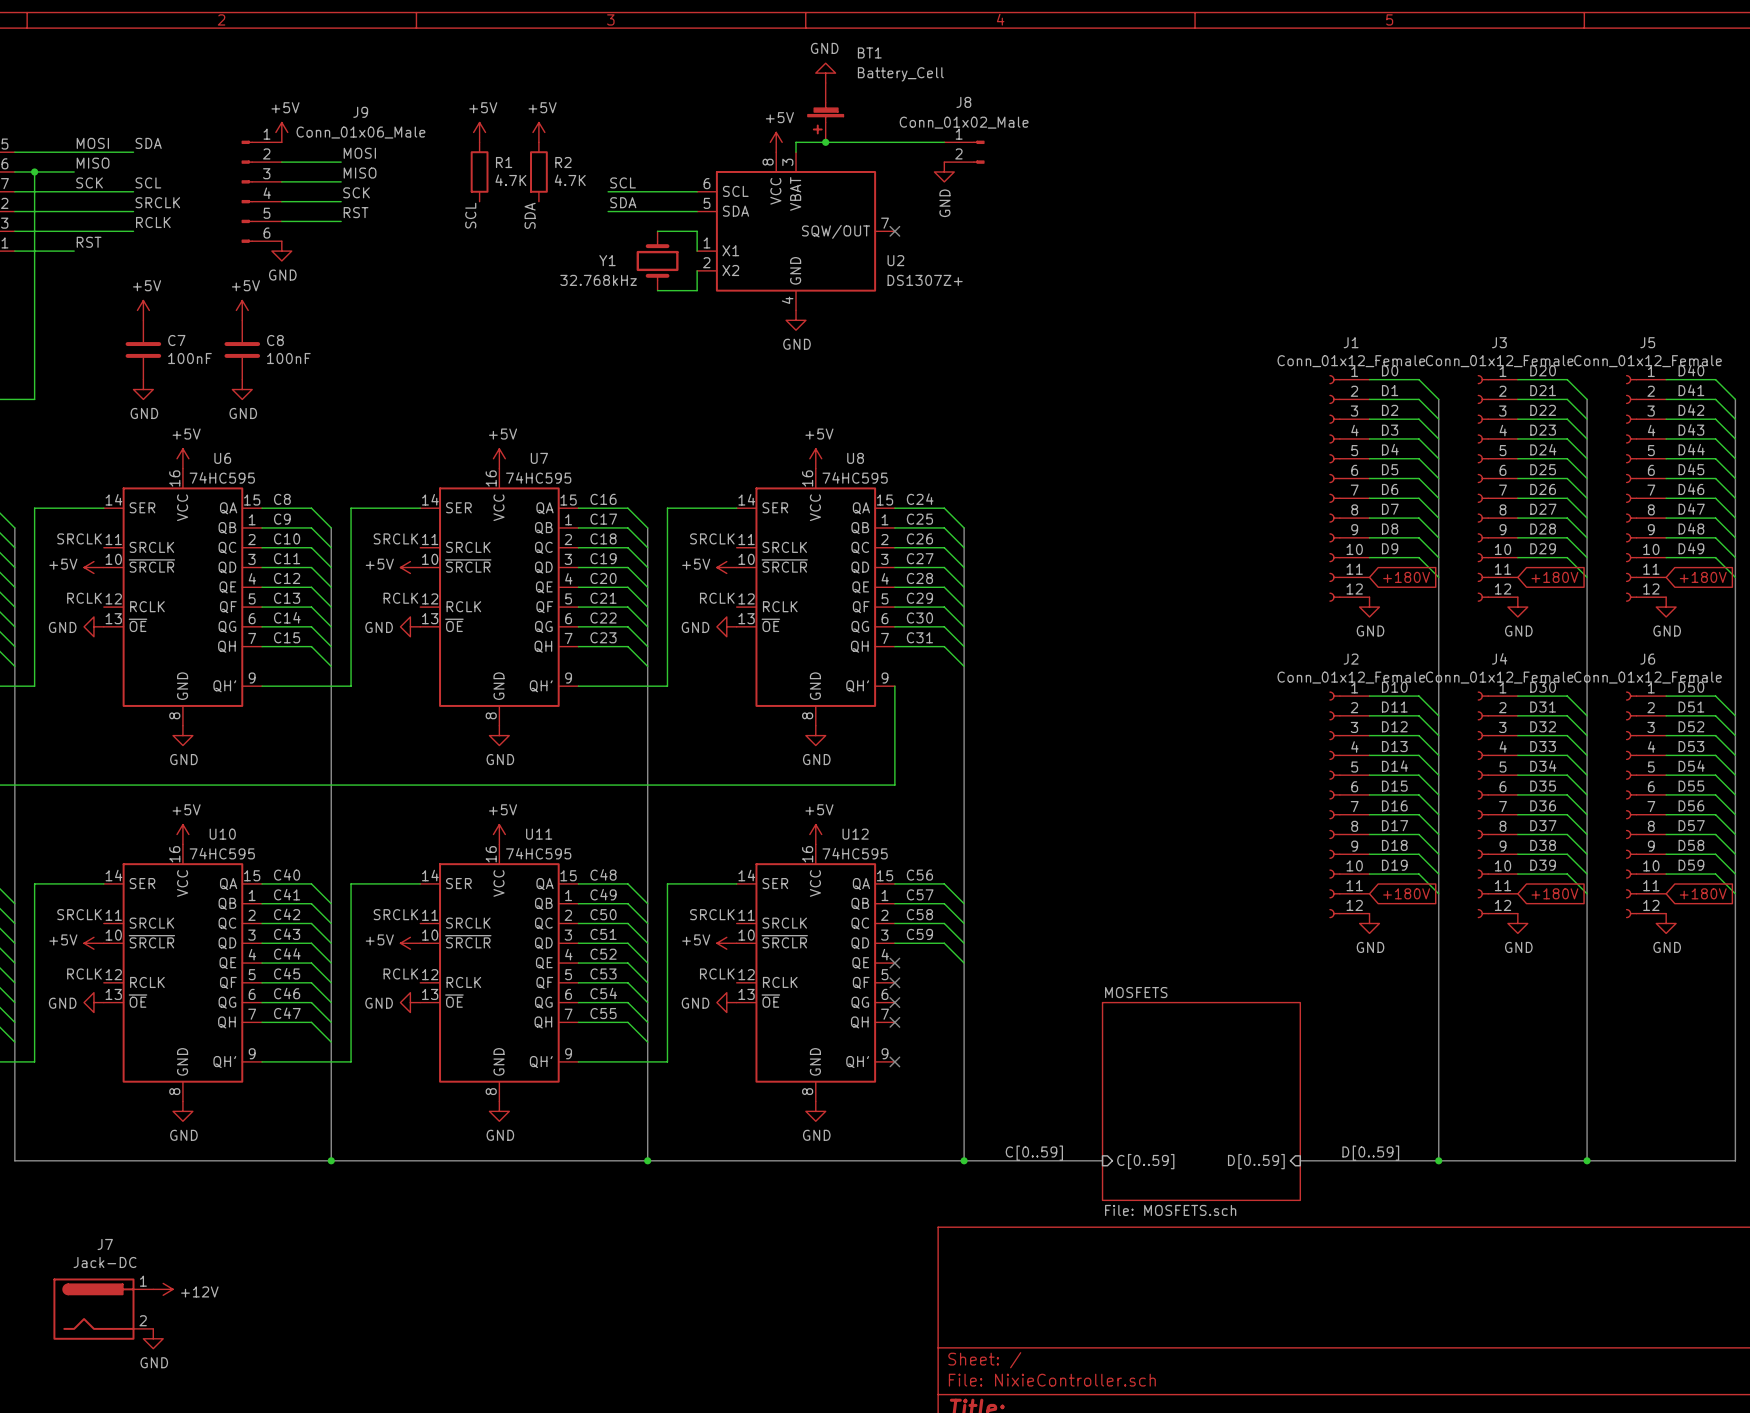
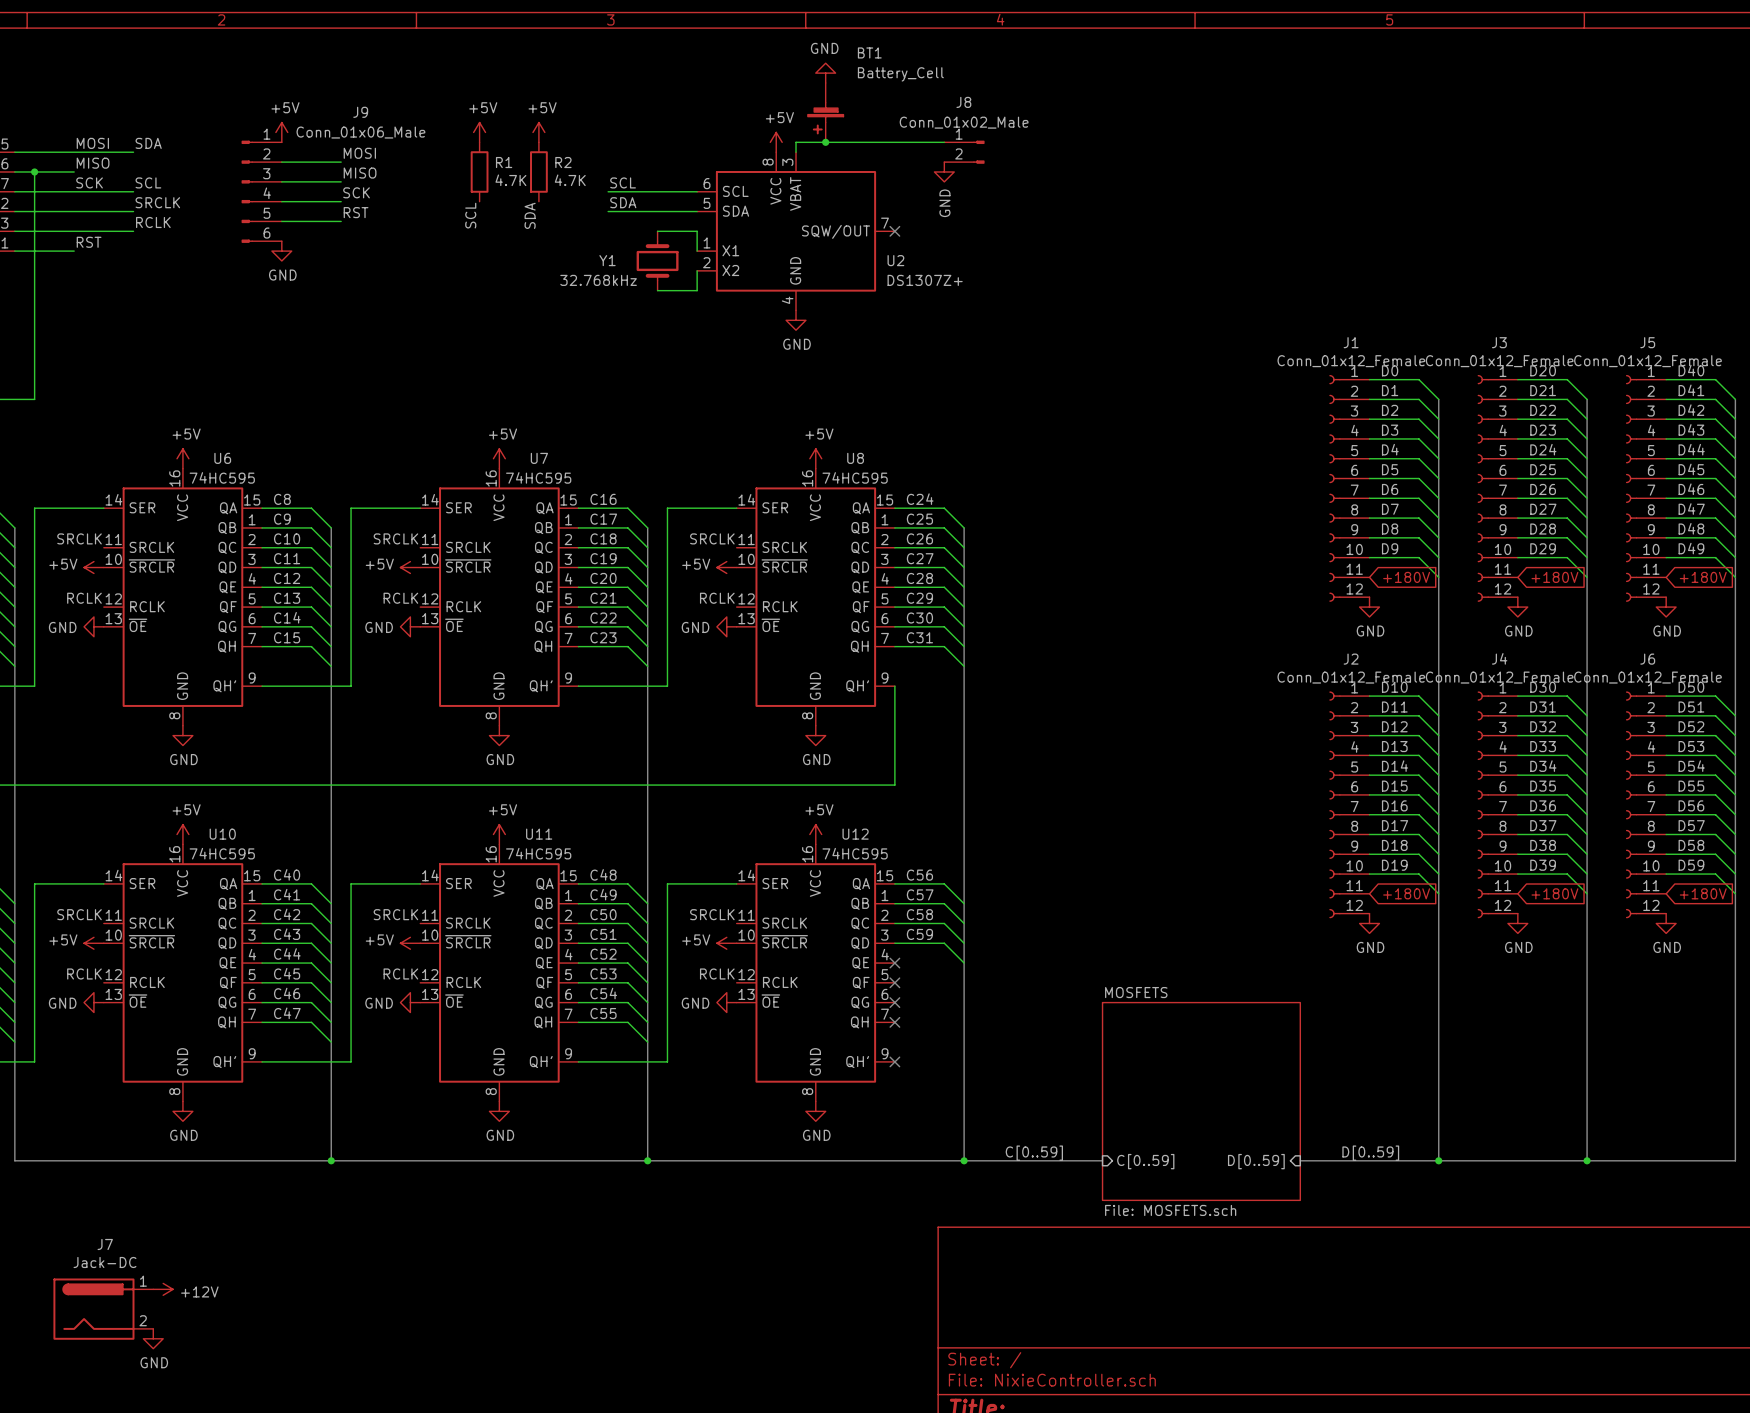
power symbol: +5V (143, 310) -> none
power symbol: +5V (242, 310) -> none
C7: 100nF (143, 349) -> none
C8: 100nF (242, 349) -> none
power symbol: GND (143, 389) -> none
power symbol: GND (242, 389) -> none

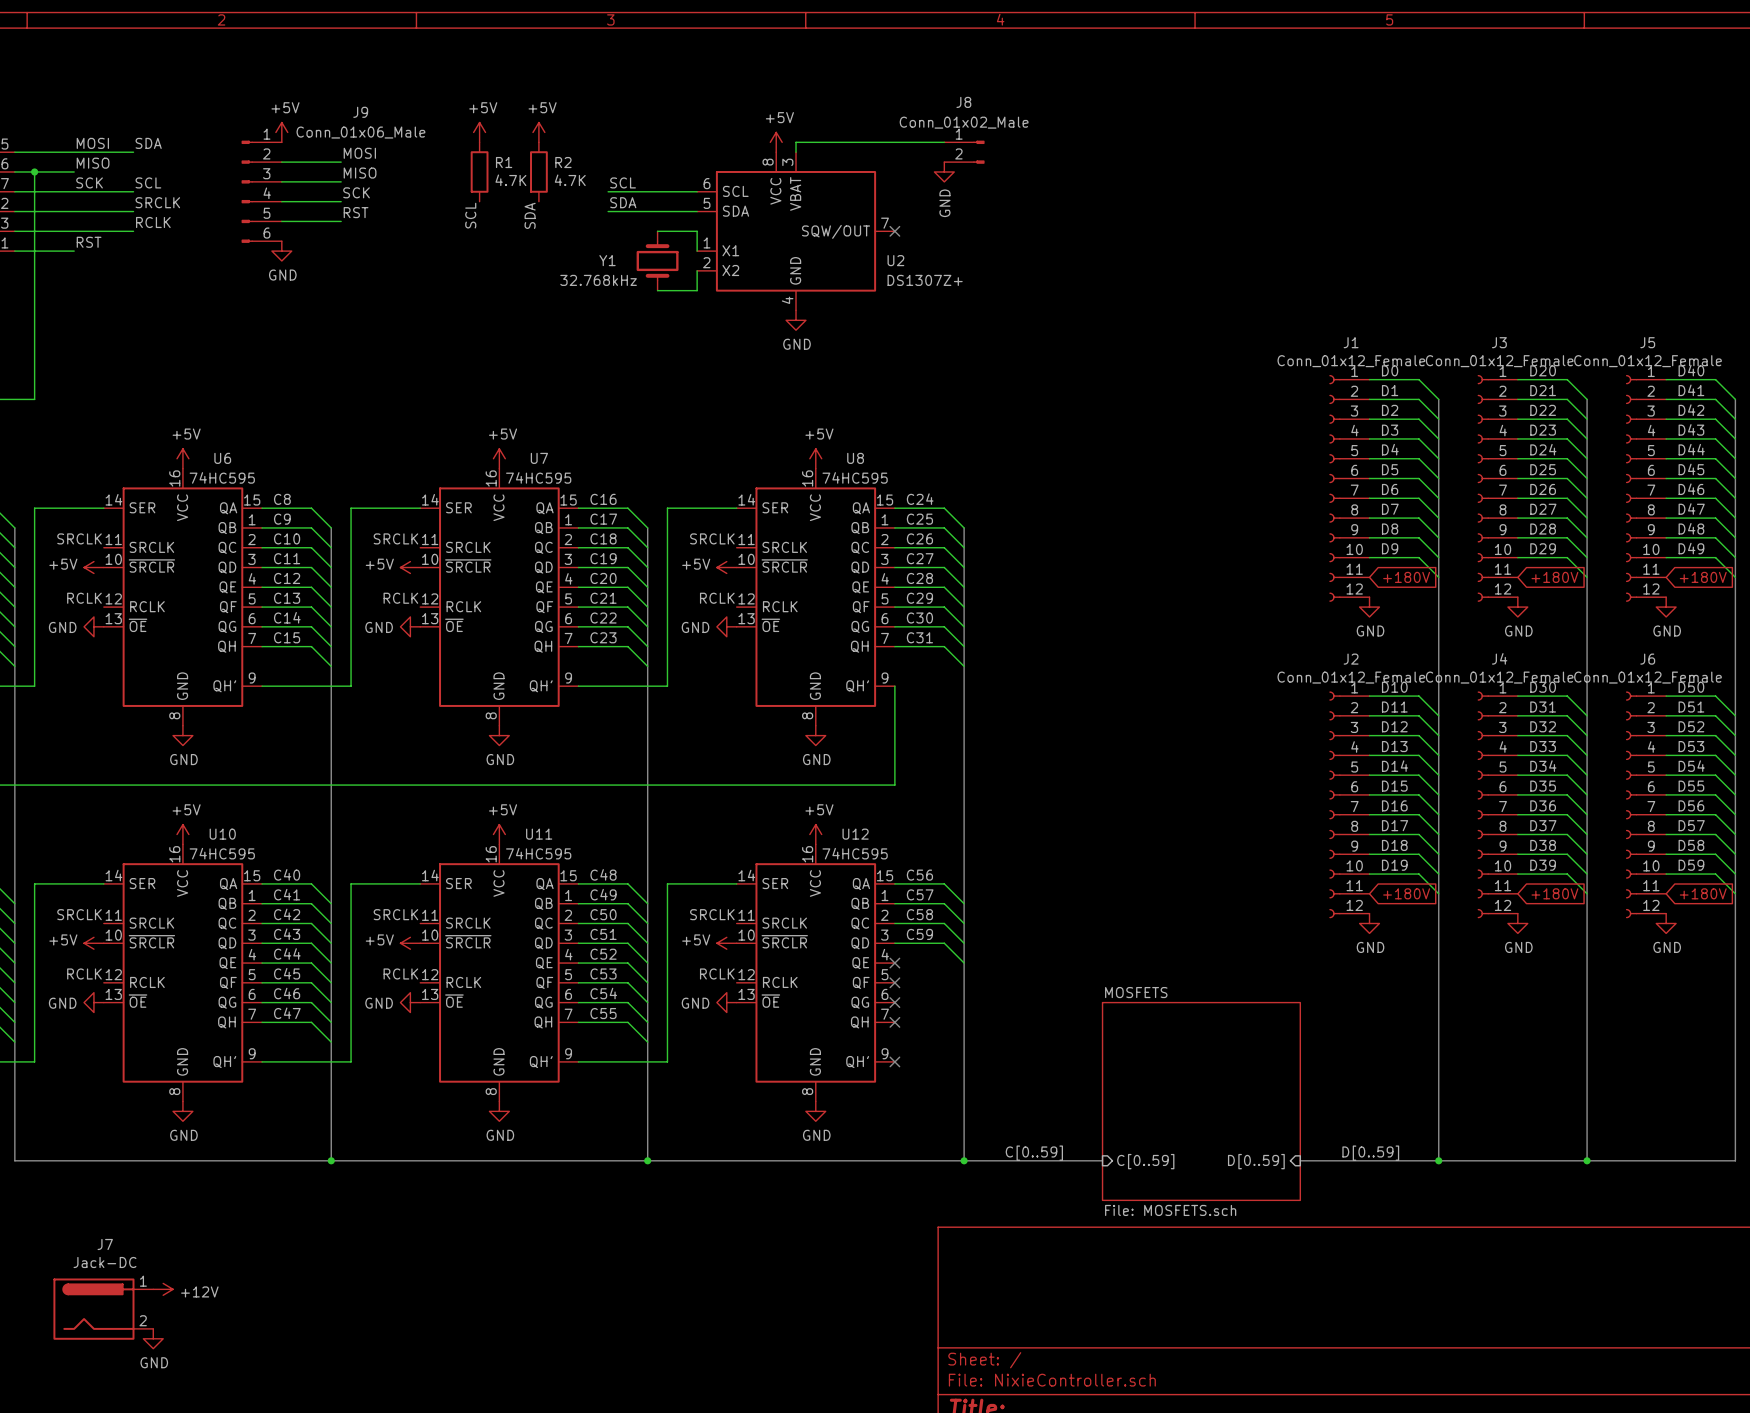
power symbol: GND (825, 73) -> none
BT1: Battery_Cell (825, 112) -> none
junction: (825, 142) -> none

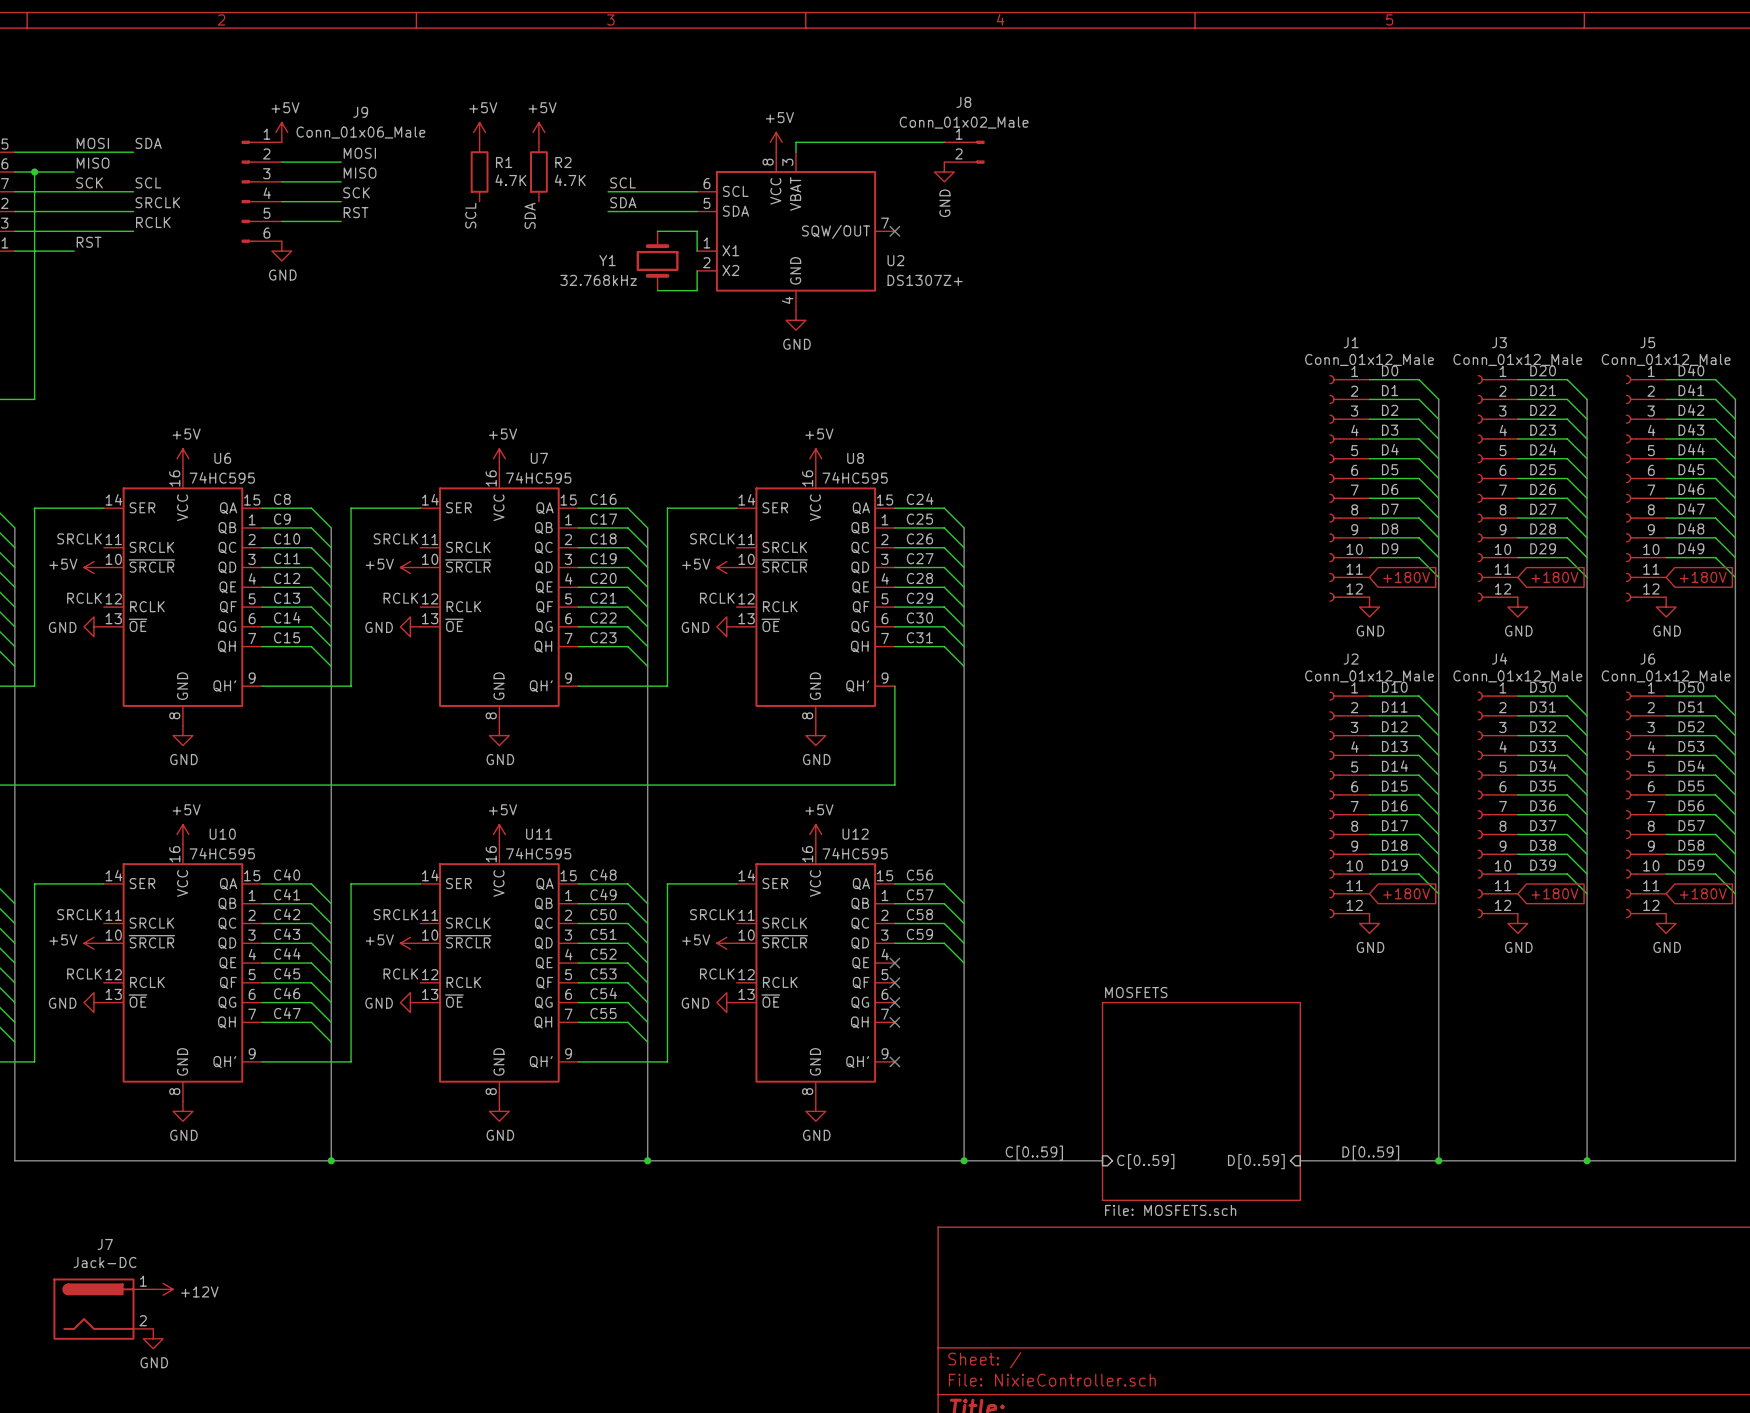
J1 value: Conn_01x12_Female (1351, 361) -> Conn_01x12_Male (1369, 359)
J3 value: Conn_01x12_Female (1499, 361) -> Conn_01x12_Male (1517, 359)
J5 value: Conn_01x12_Female (1647, 361) -> Conn_01x12_Male (1666, 359)
J2 value: Conn_01x12_Female (1351, 677) -> Conn_01x12_Male (1369, 676)
J4 value: Conn_01x12_Female (1499, 677) -> Conn_01x12_Male (1517, 676)
J6 value: Conn_01x12_Female (1647, 677) -> Conn_01x12_Male (1666, 676)

